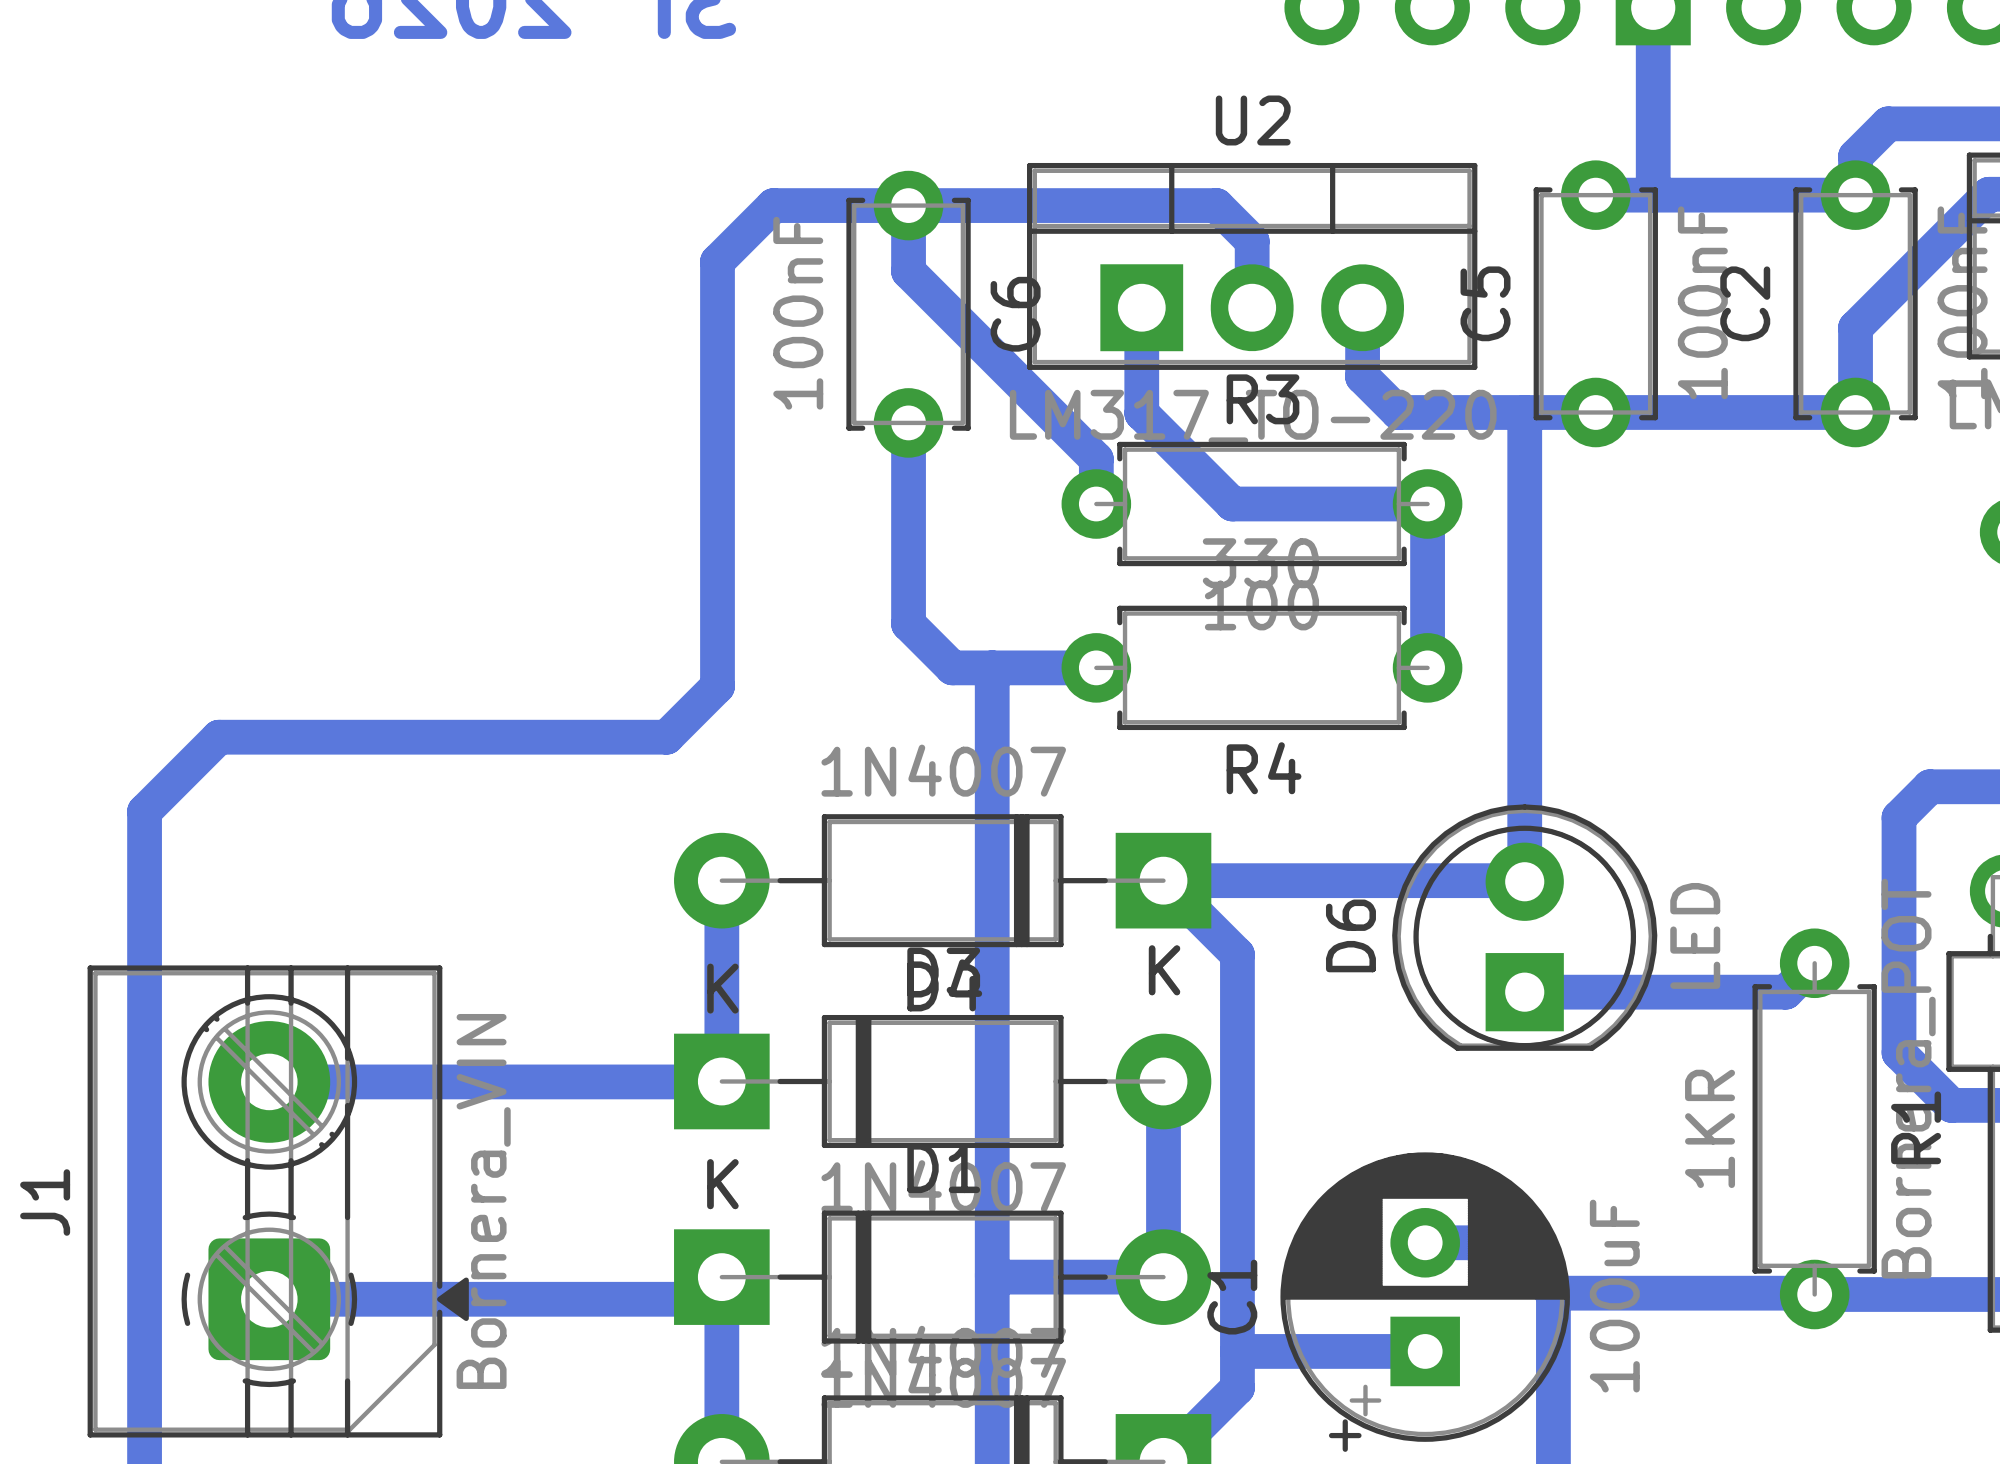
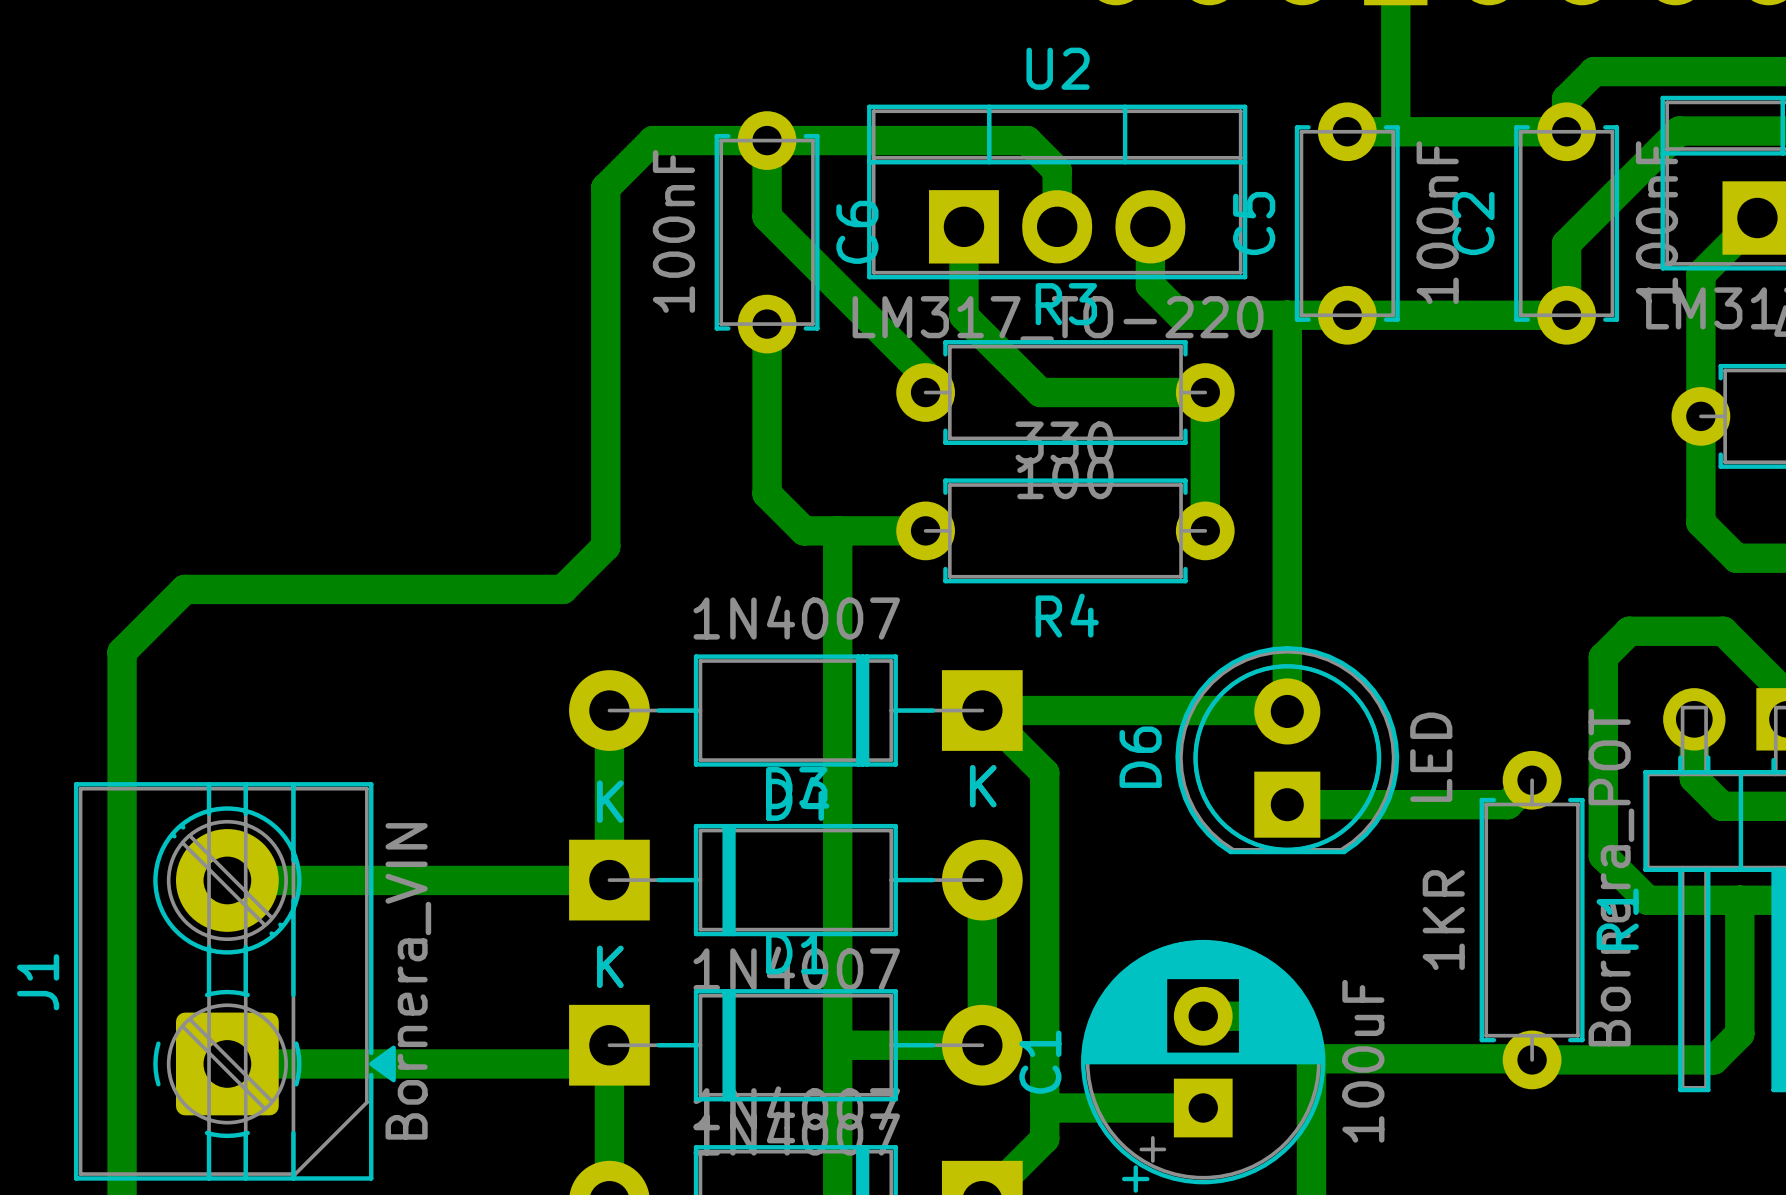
bottom track: (908, 271) (1096, 459) (1096, 483) -> (767, 196) (767, 216) (925, 375)

